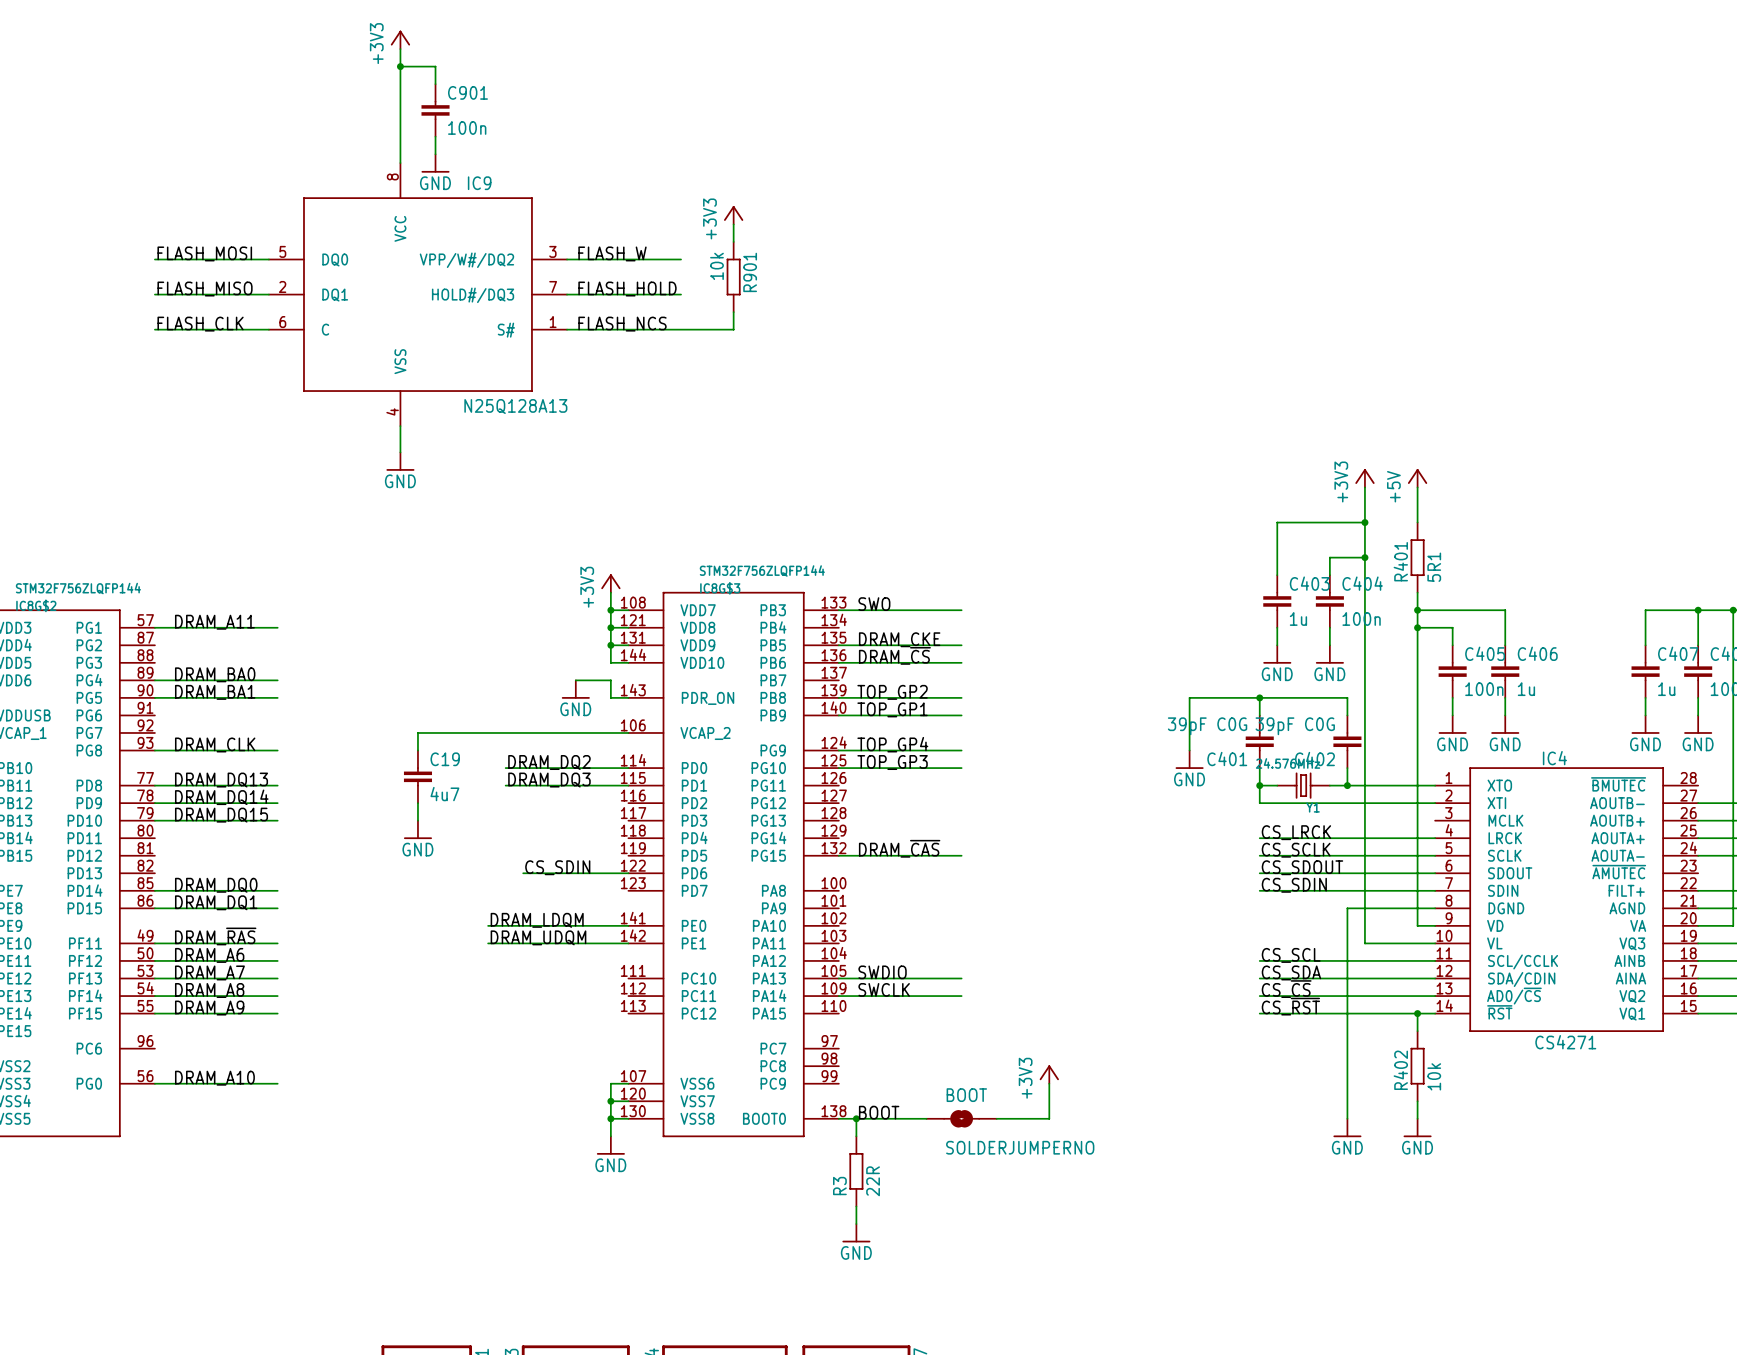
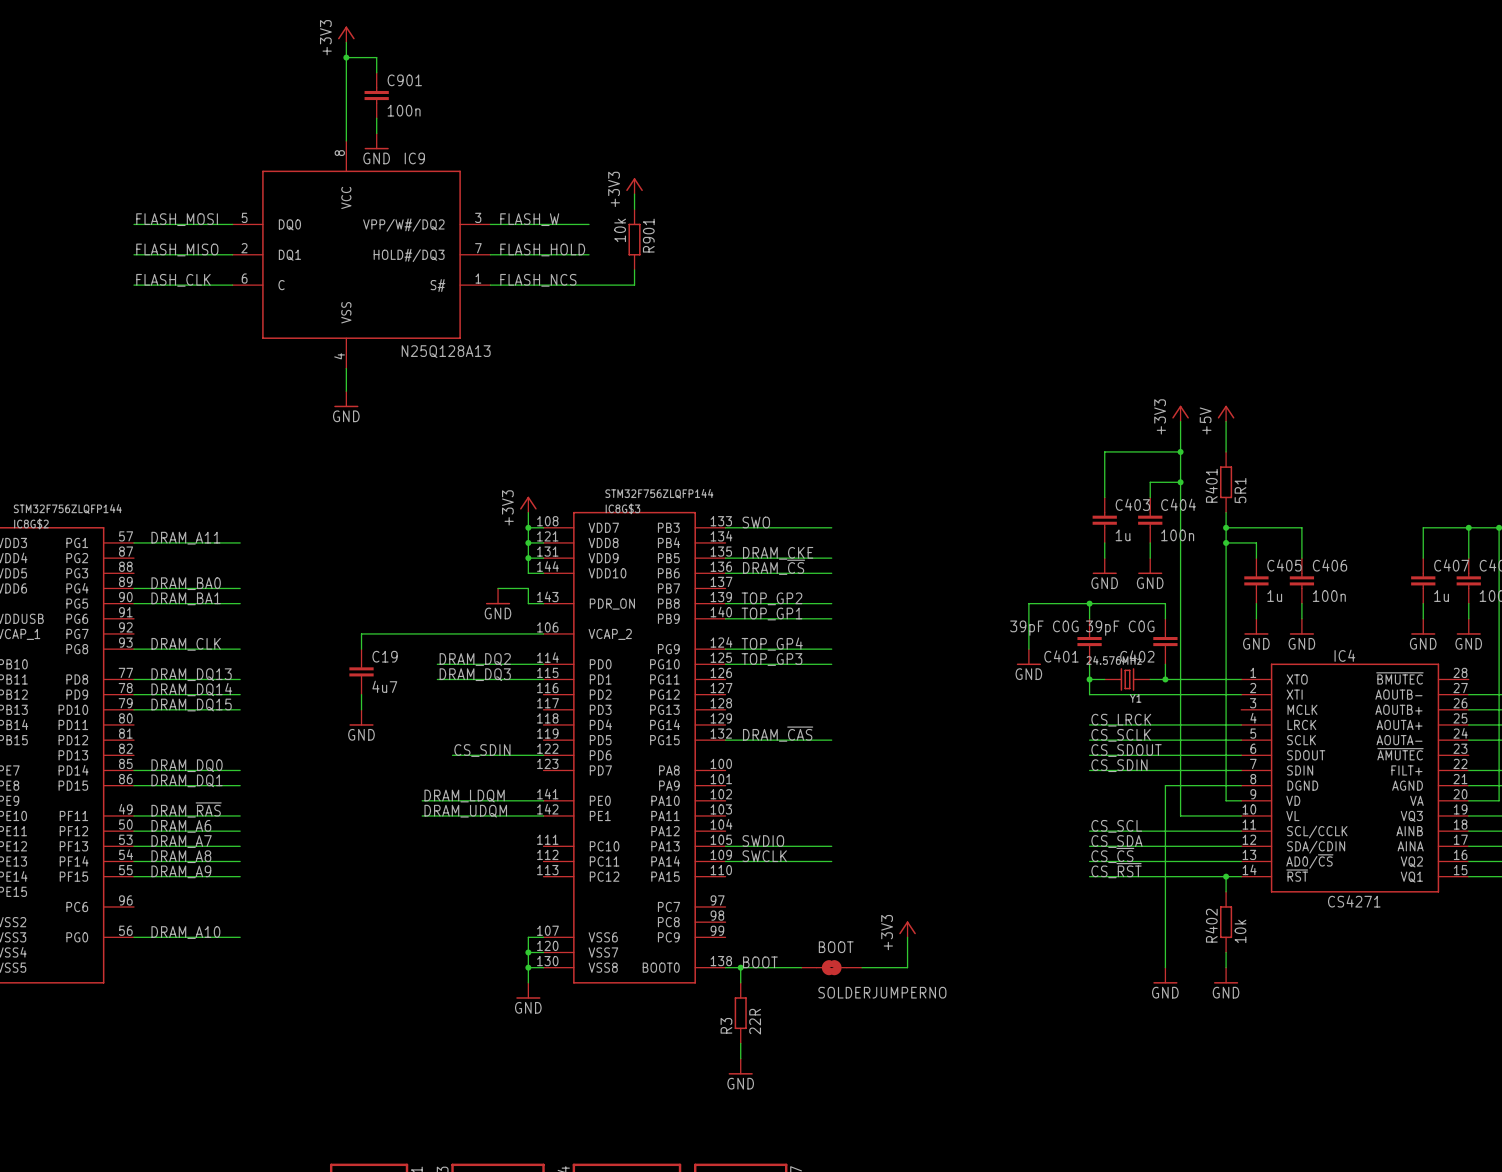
C405 value: 100n (1484, 689) -> 1u (1274, 596)
C406 value: 1u (1526, 689) -> 100n (1329, 596)

